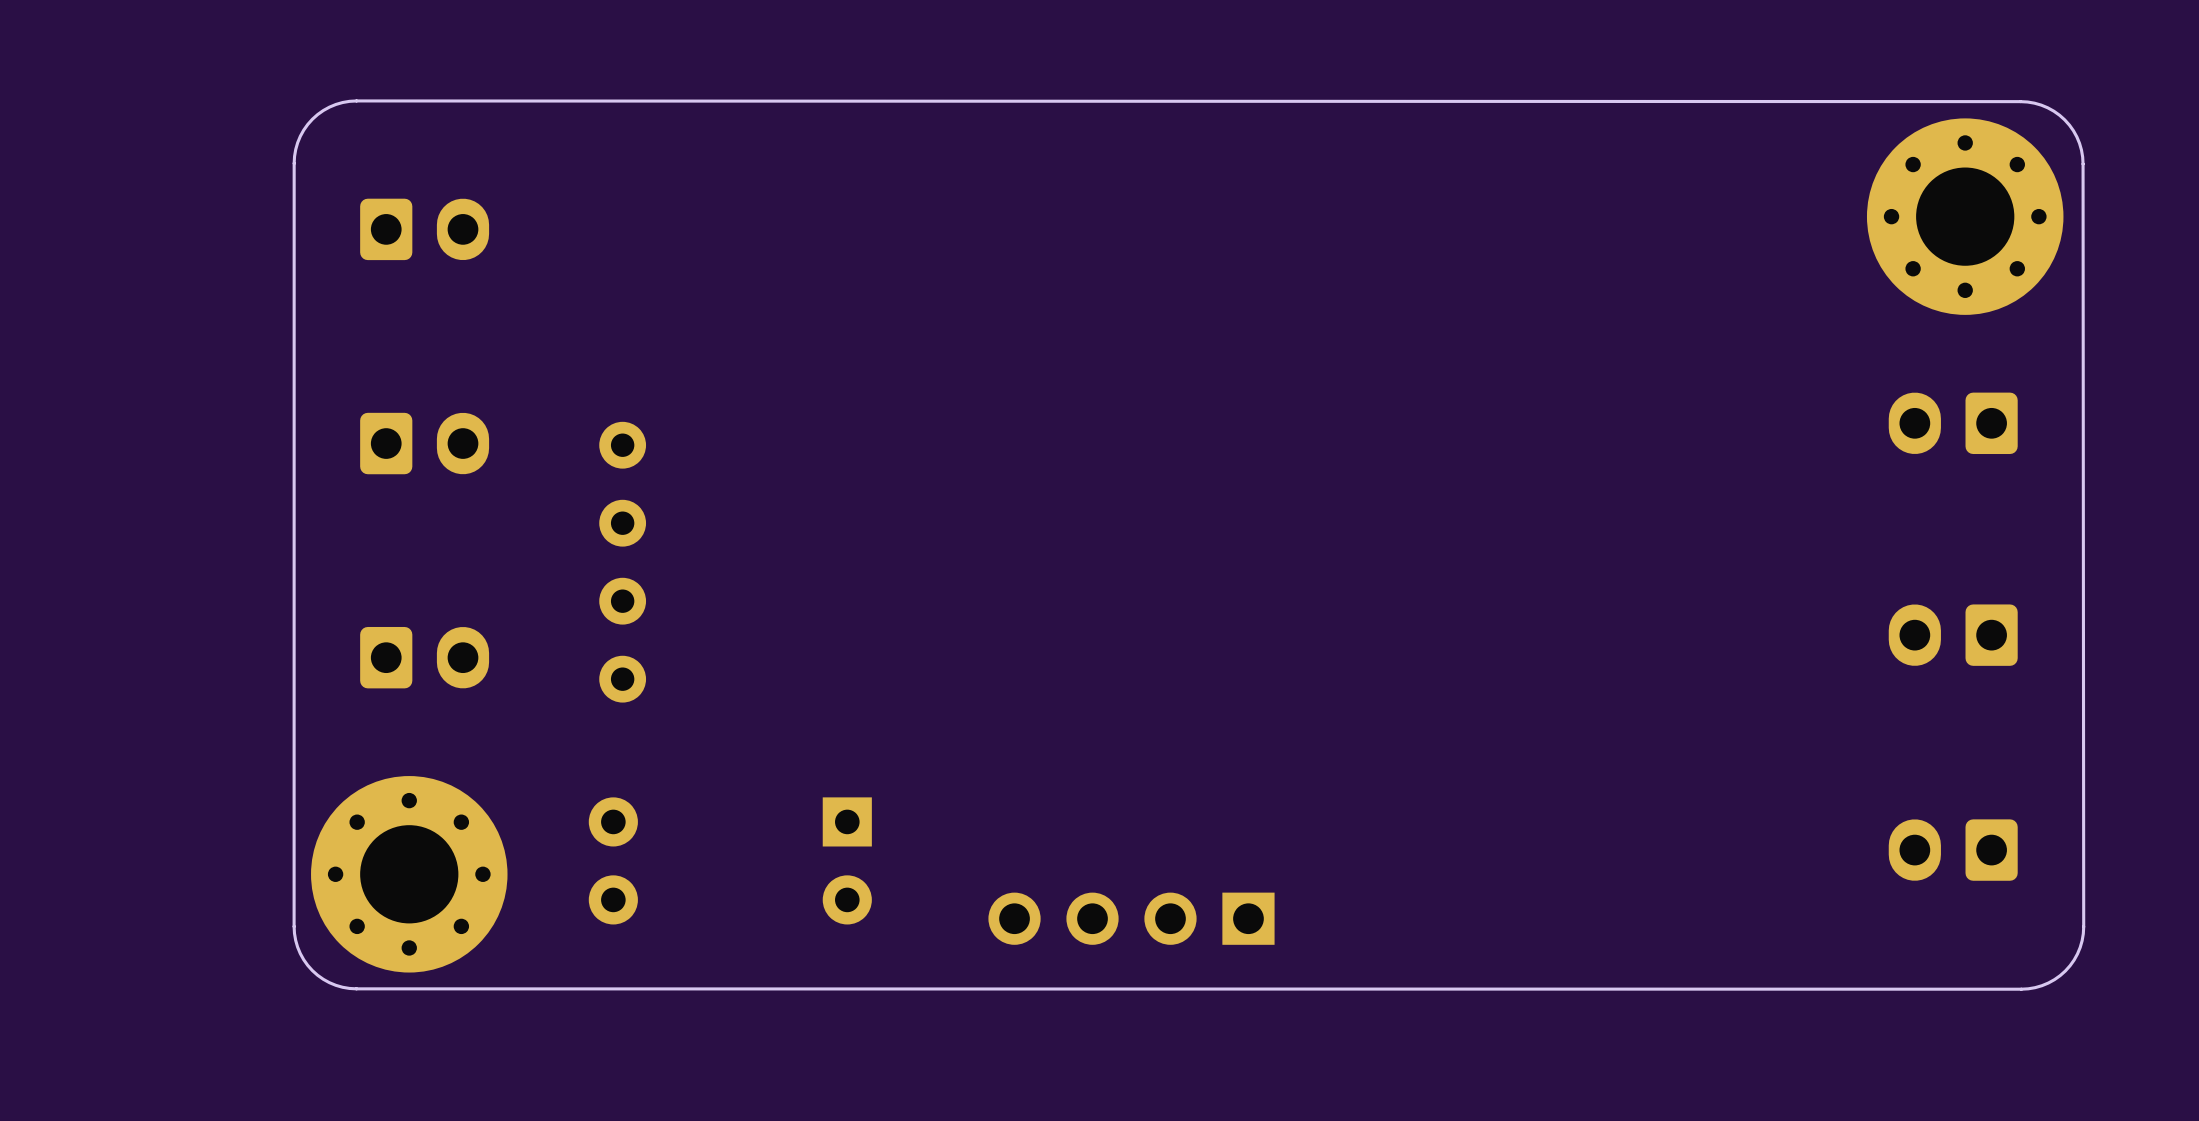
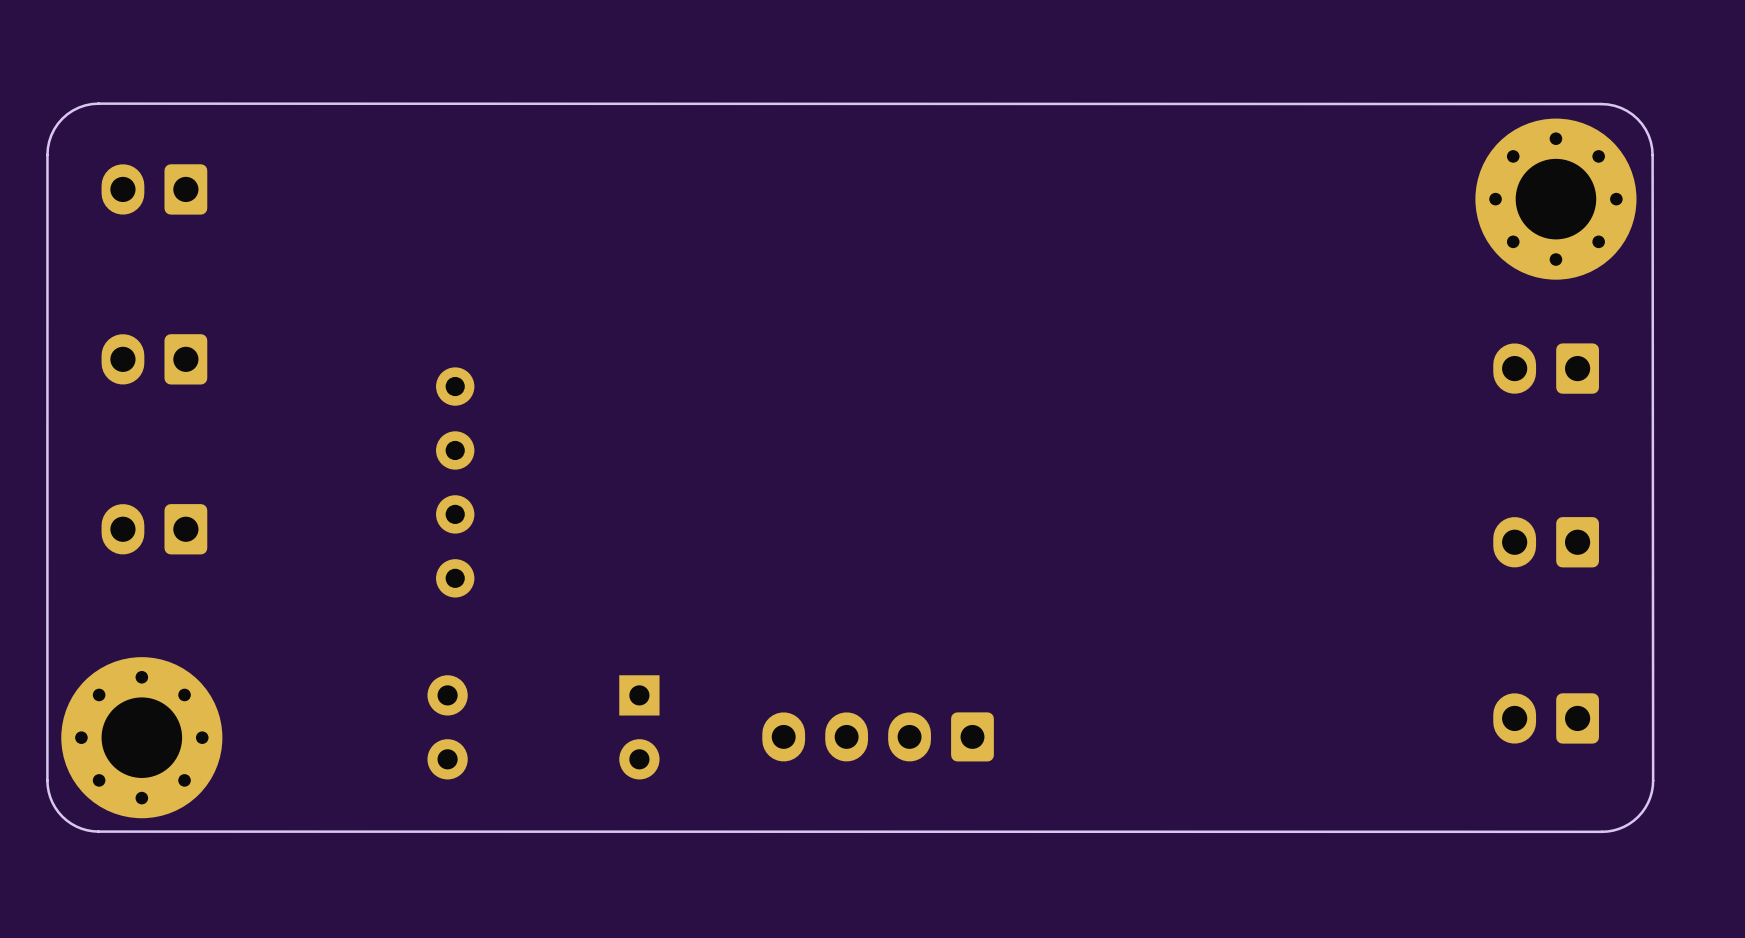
board edge: (2083, 164) (2081, 150) (2076, 136) (2064, 119) (2053, 111) (2041, 105) (2020, 101) (356, 100) (342, 102) (329, 107) (312, 119) (303, 130) (295, 149) (294, 163) (294, 926) (295, 940) (300, 953) (312, 970) (323, 979) (335, 985) (356, 988) (2021, 989) (2035, 987) (2048, 983) (2065, 970) (2074, 960) (2080, 947) (2083, 925) -> (1652, 155) (1648, 135) (1637, 119) (1621, 107) (1601, 104) (98, 103) (79, 107) (67, 114) (58, 123) (51, 135) (47, 154) (47, 780) (50, 797) (62, 816) (81, 828) (98, 831) (1601, 831) (1618, 828) (1638, 816) (1650, 797) (1653, 780)
part: none -> (154, 189)
part: (424, 229) -> none
part: none -> (154, 359)
part: (424, 443) -> none
part: none -> (154, 529)
part: (424, 657) -> none
part: none -> (878, 736)
part position: (409, 874) -> (141, 737)
part: (1131, 918) -> none

